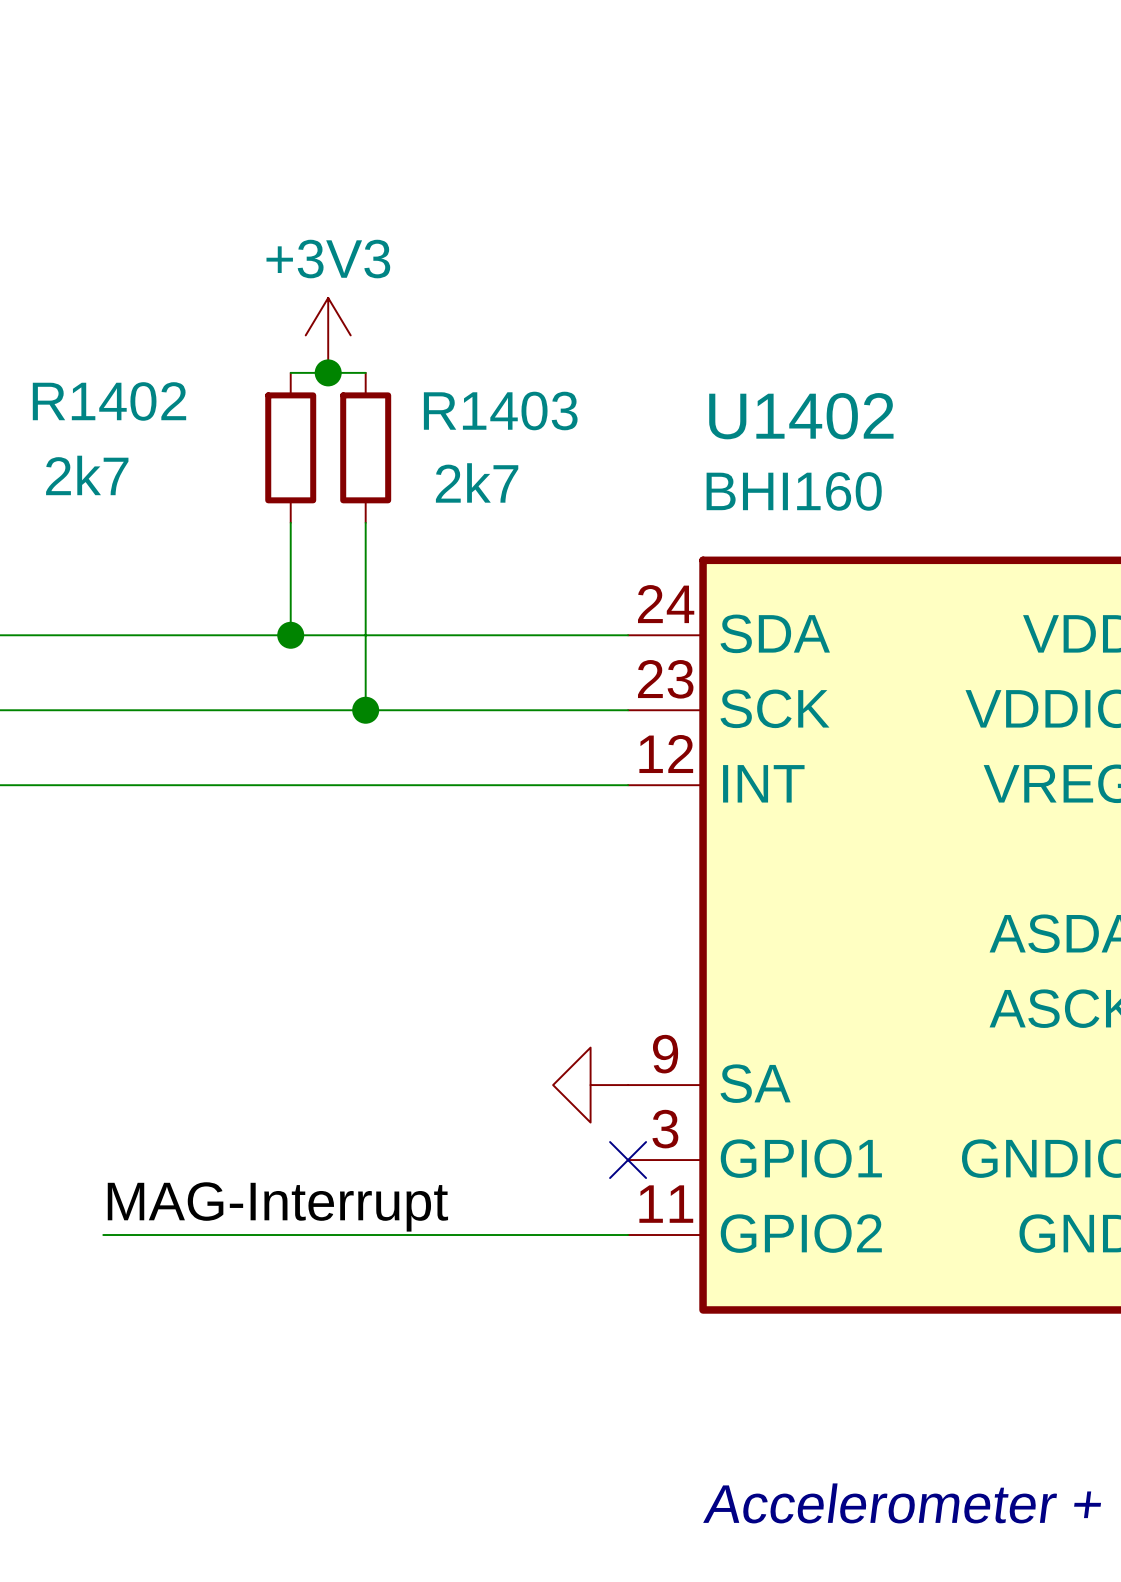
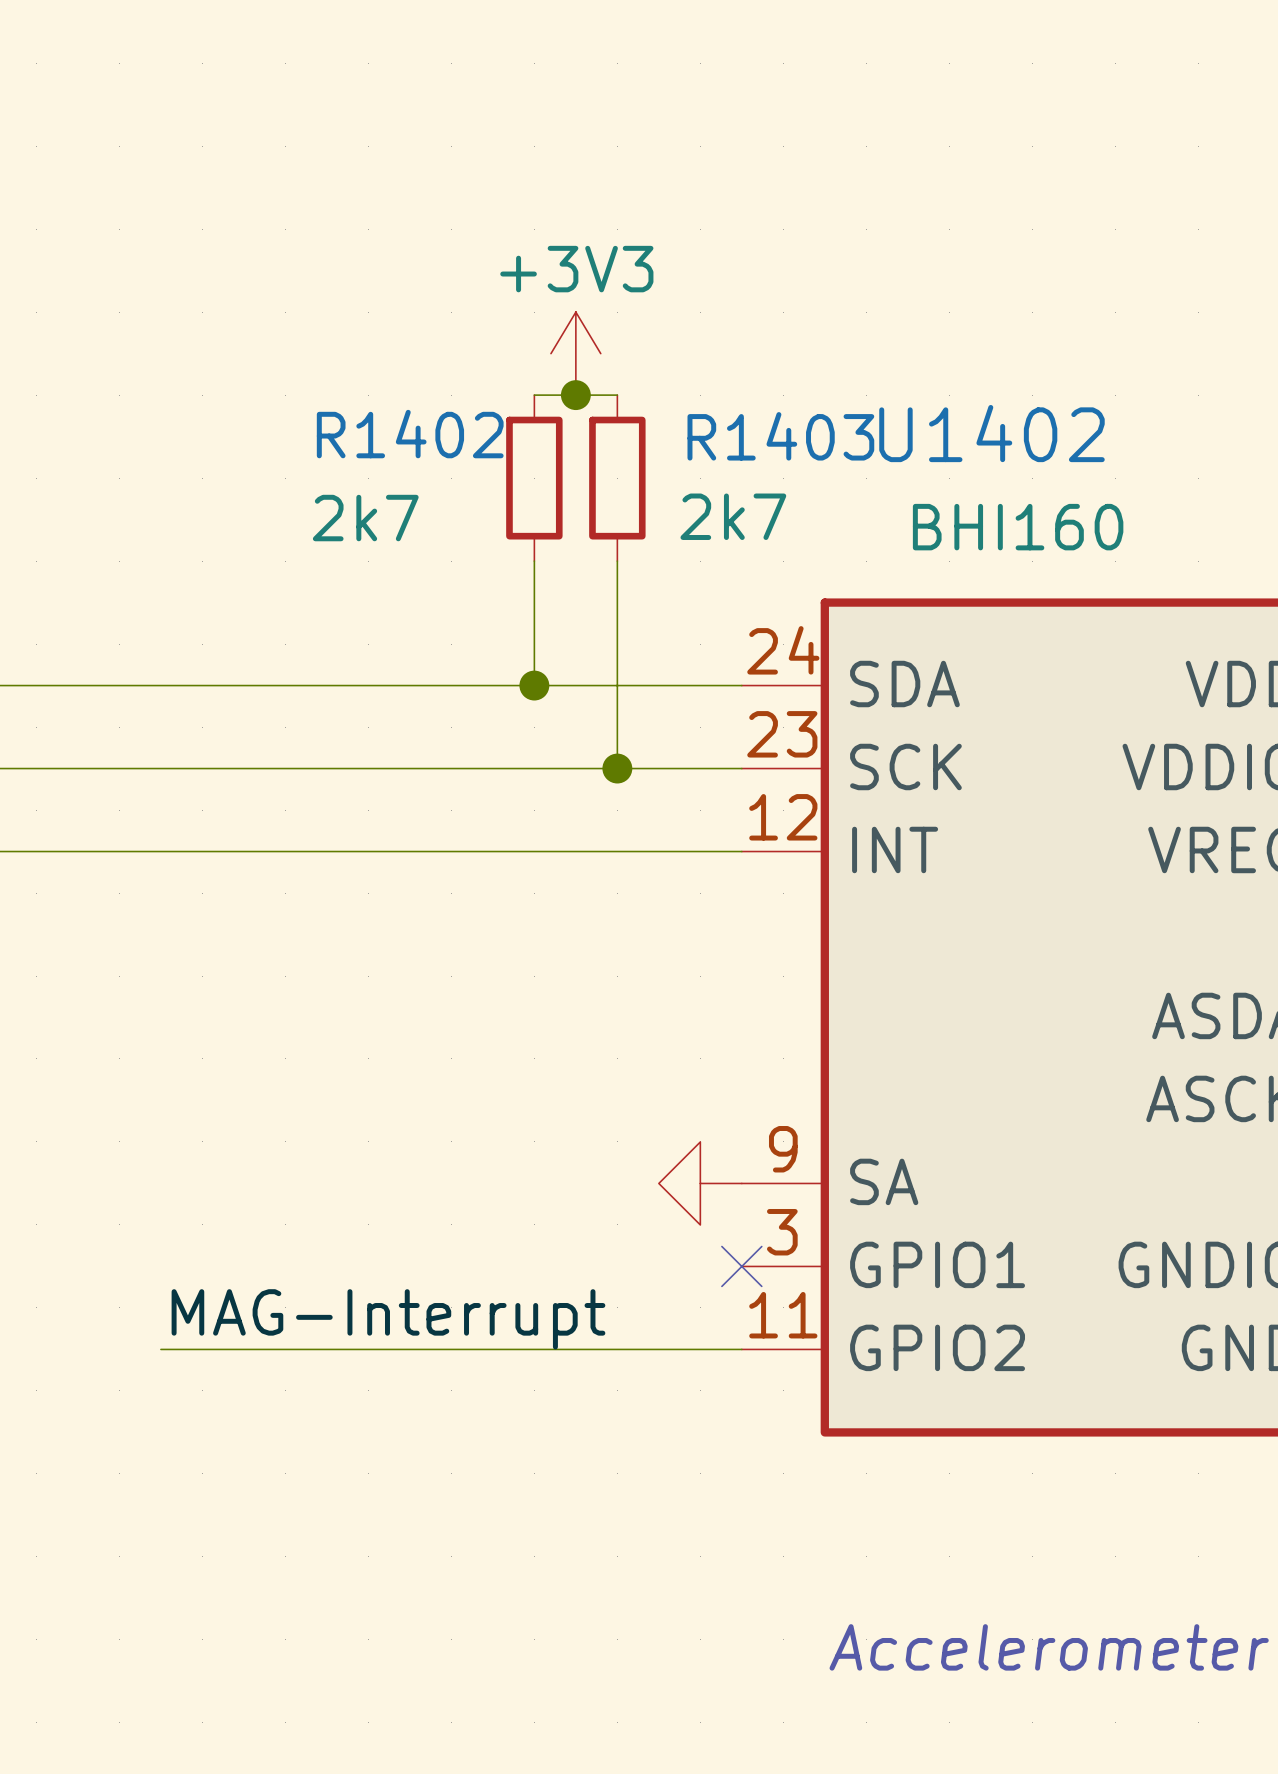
power symbol position: +3V3 (328, 335) -> +3V3 (575, 353)
wire: (290, 372) (365, 372) -> (534, 395) (617, 395)
junction: (328, 372) -> none
junction: none -> (575, 395)
R1402 name position: R1402 (109, 401) -> R1402 (410, 434)
U1402 name position: U1402 (801, 416) -> U1402 (991, 433)
R1402 position: (290, 447) -> (534, 478)
R1403 position: (365, 447) -> (617, 478)
R1402 value position: 2k7 (87, 475) -> 2k7 (365, 518)
R1403 value position: 2k7 (477, 482) -> 2k7 (733, 516)
U1402 value position: BHI160 (794, 491) -> BHI160 (1018, 527)
wire: (290, 522) (290, 635) -> (534, 561) (534, 685)
wire: (365, 522) (365, 710) -> (617, 561) (617, 768)
junction: (290, 635) -> none
junction: none -> (534, 685)
junction: (365, 710) -> none
junction: none -> (617, 768)

